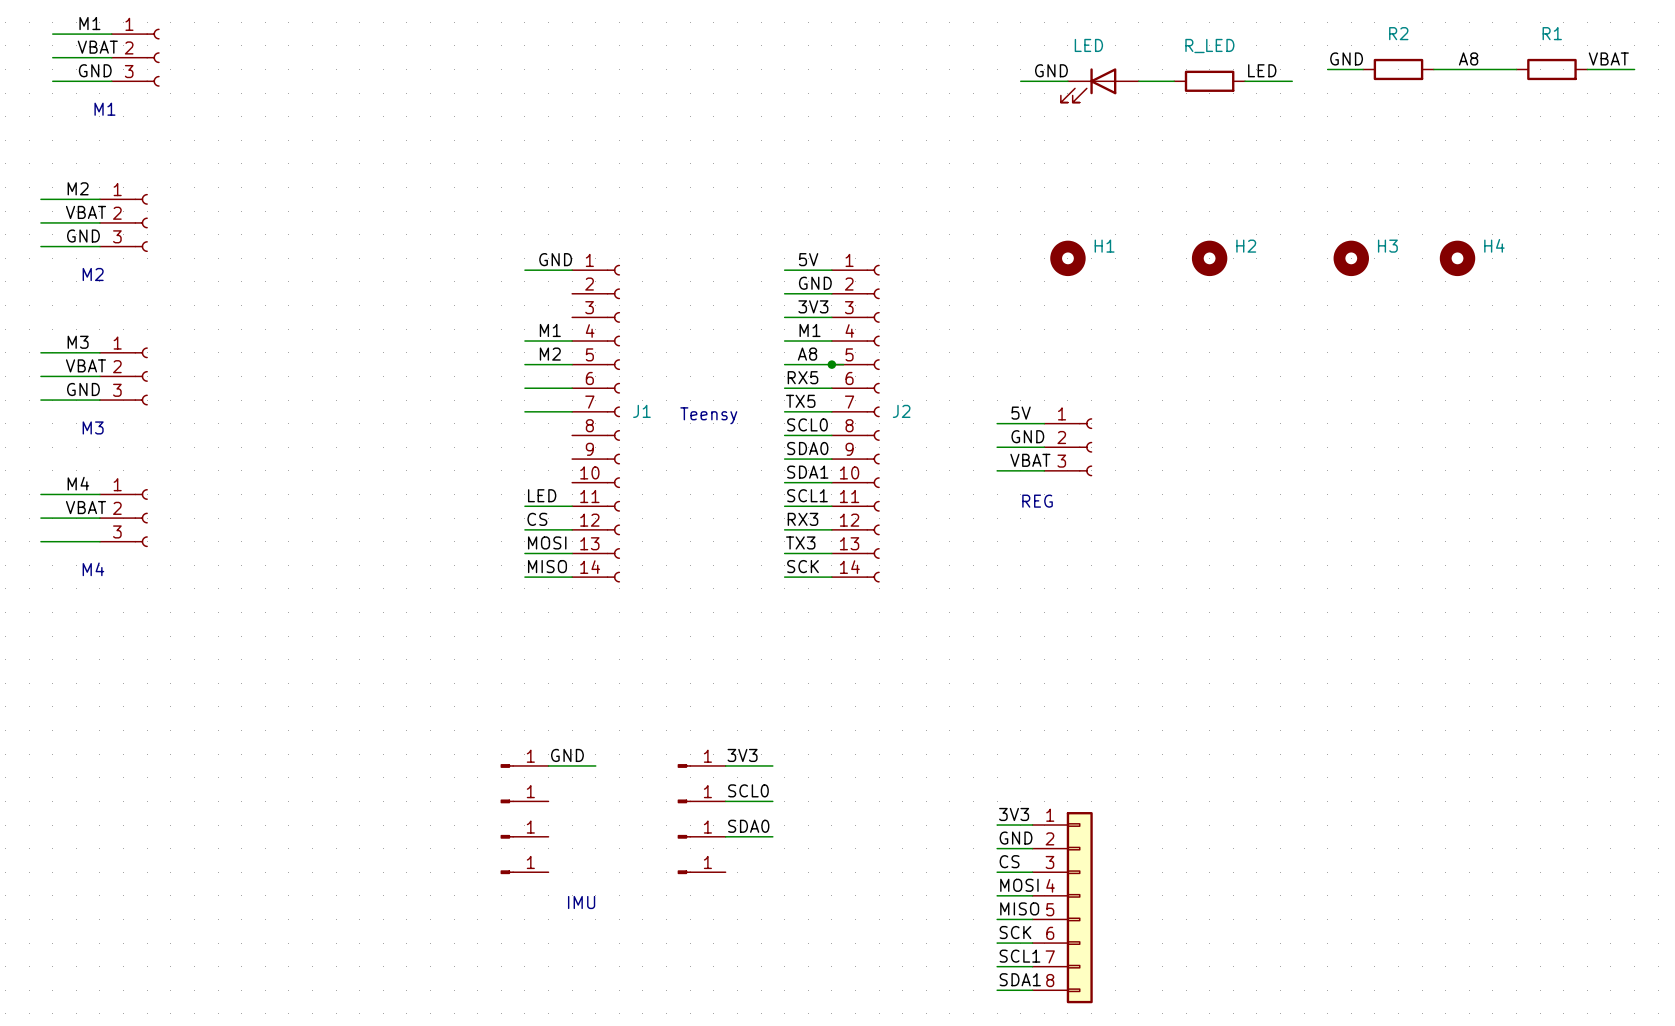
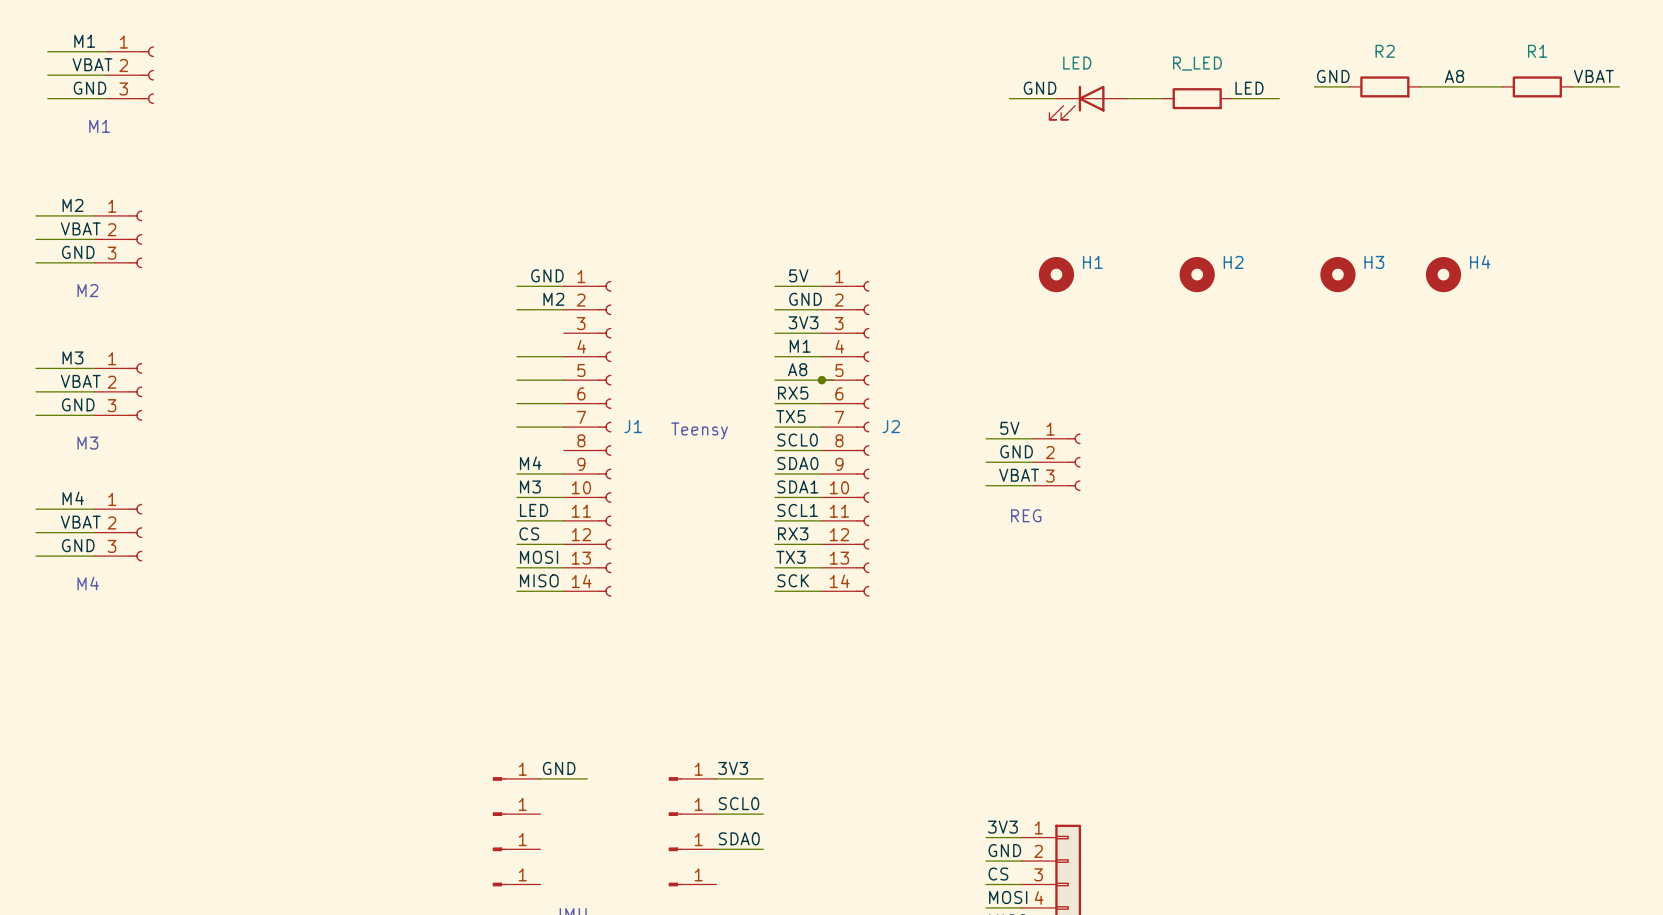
wire: none -> (516, 309) (563, 309)
label: M1 (550, 330) -> none
label position: M2 (550, 354) -> M2 (553, 299)
label: none -> M4 (530, 463)
wire: none -> (516, 473) (563, 473)
label: none -> M3 (530, 486)
wire: none -> (516, 497) (563, 497)
label: none -> GND (78, 545)

